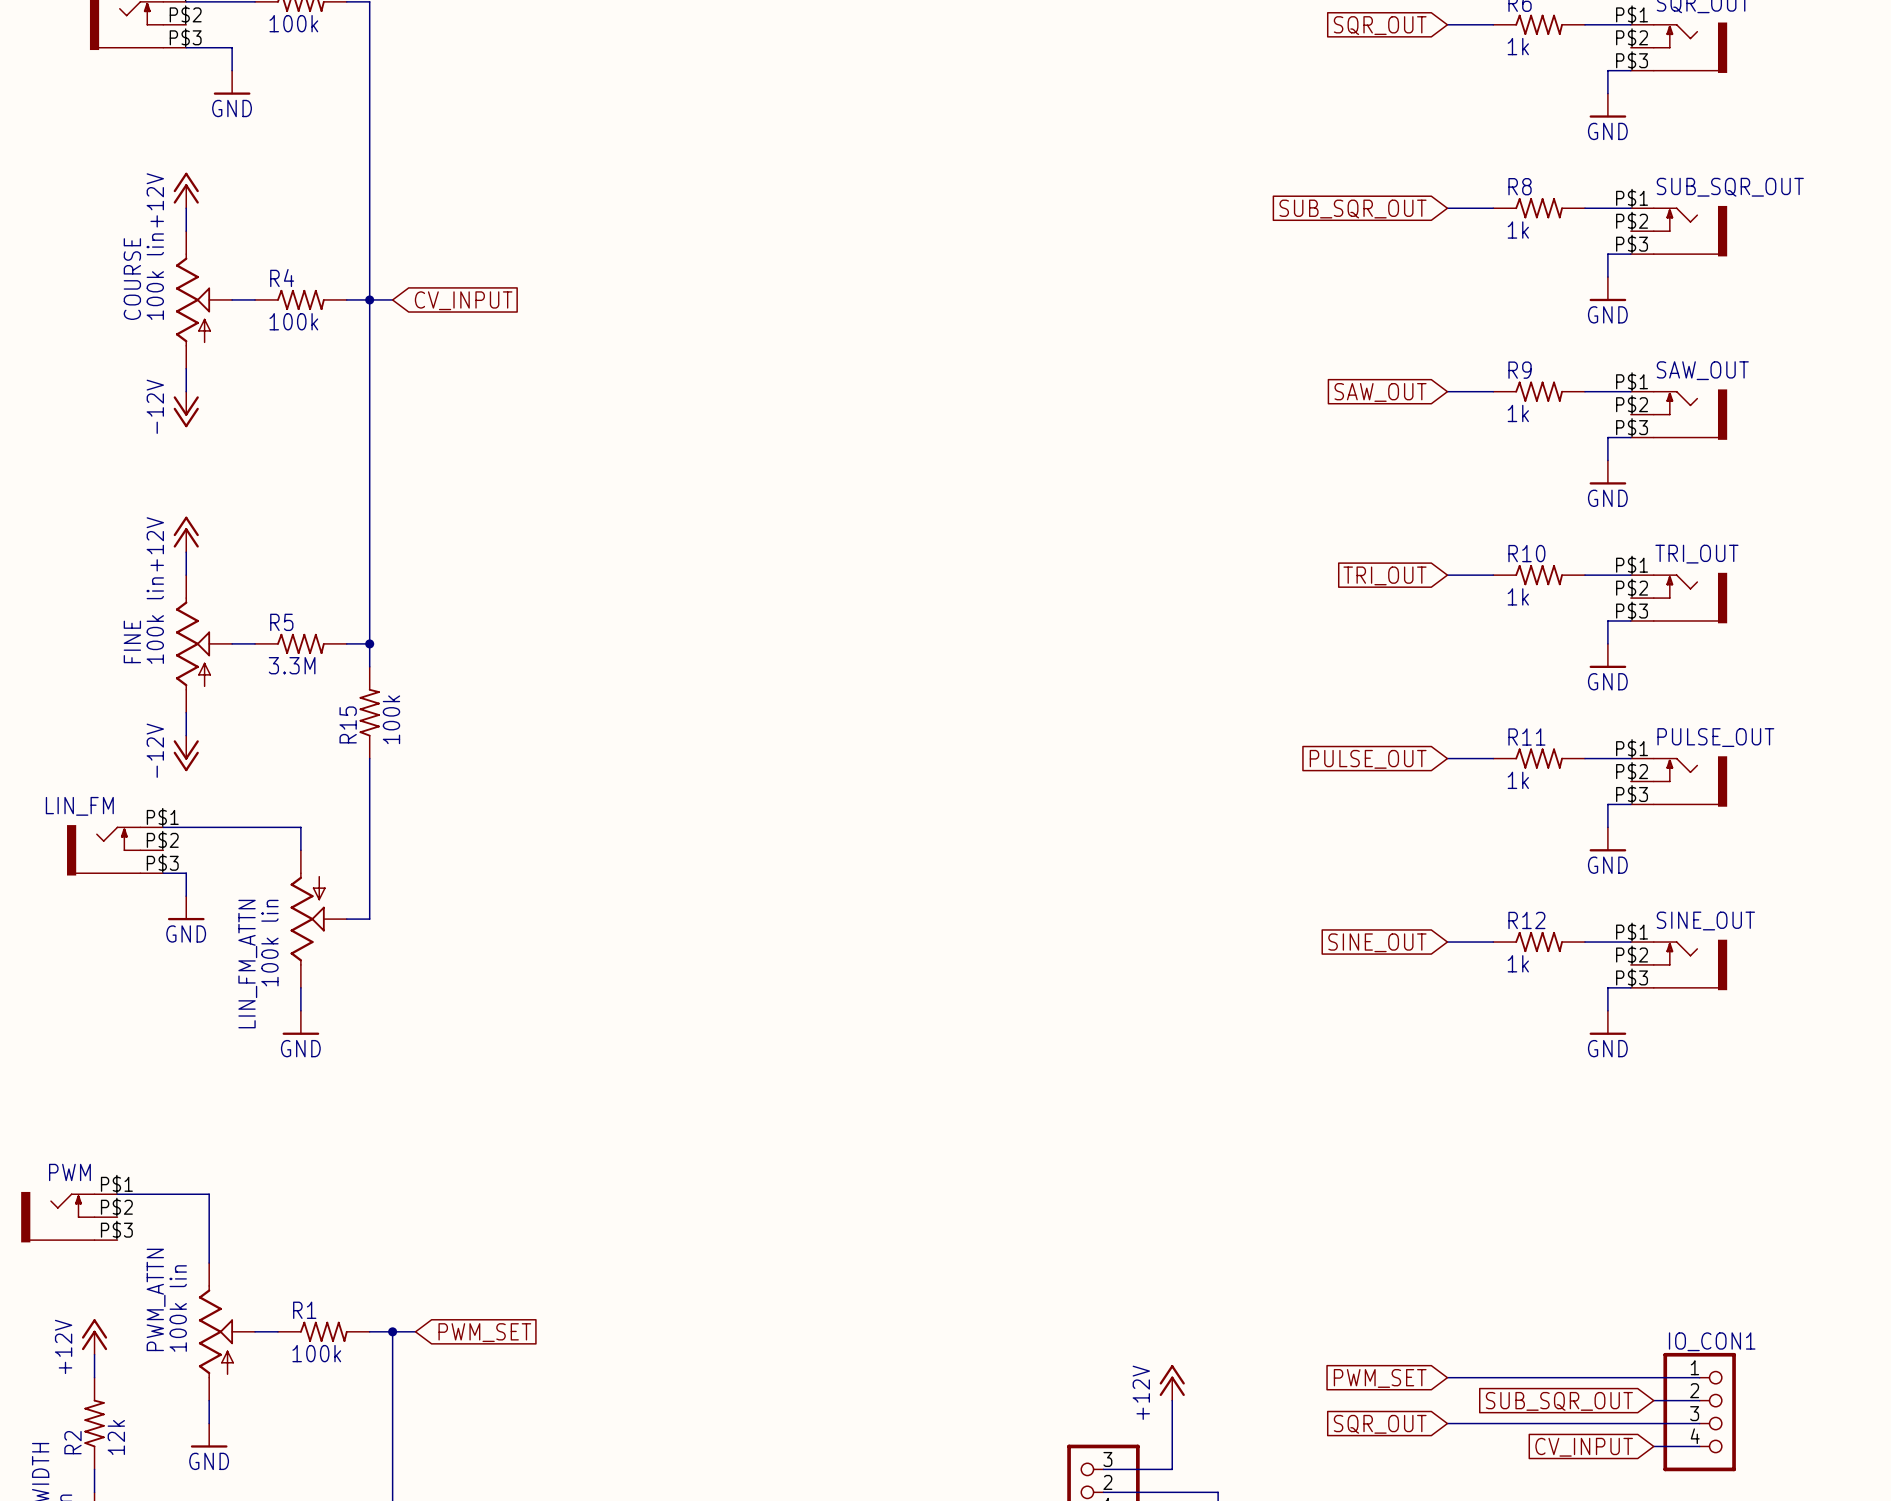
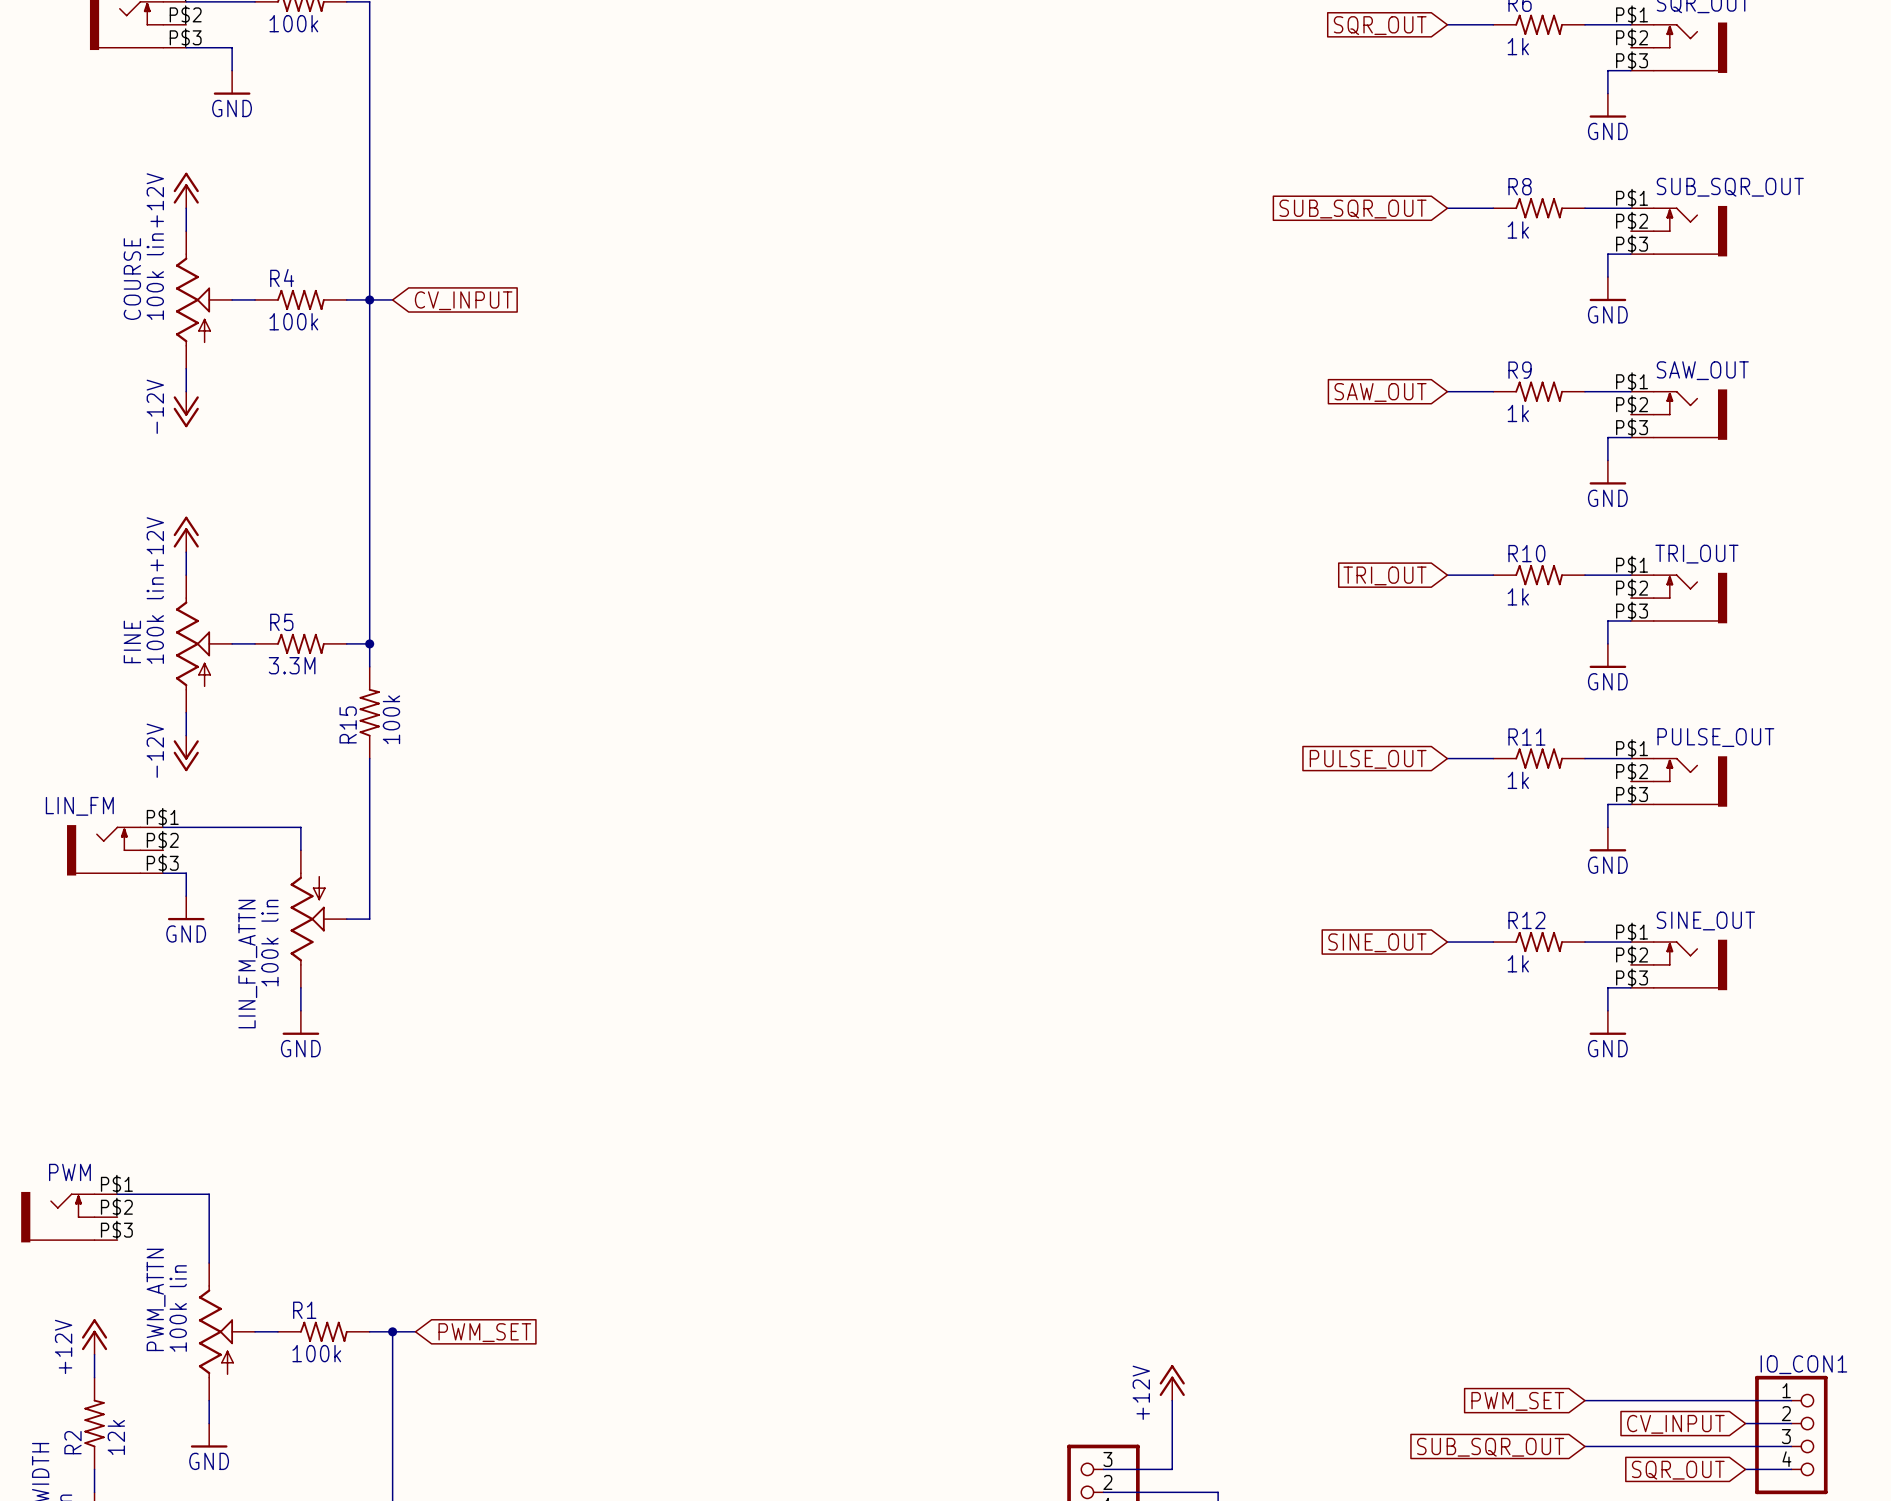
wire: (1447, 1377) (1699, 1377) -> none
global label position: PWM_SET (1380, 1378) -> PWM_SET (1517, 1401)
wire: none -> (1584, 1400) (1653, 1400)
wire: none -> (1699, 1400) (1791, 1400)
global label position: SUB_SQR_OUT (1559, 1401) -> SUB_SQR_OUT (1490, 1447)
IO_CON1 position: (1699, 1412) -> (1791, 1435)
wire: (1447, 1423) (1699, 1423) -> none
wire: none -> (1745, 1423) (1791, 1423)
global label: SQR_OUT (1380, 1424) -> none
wire: none -> (1584, 1446) (1653, 1446)
wire: none -> (1699, 1446) (1791, 1446)
global label position: CV_INPUT (1584, 1447) -> CV_INPUT (1675, 1424)
wire: none -> (1745, 1469) (1791, 1469)
global label: none -> SQR_OUT (1678, 1470)

